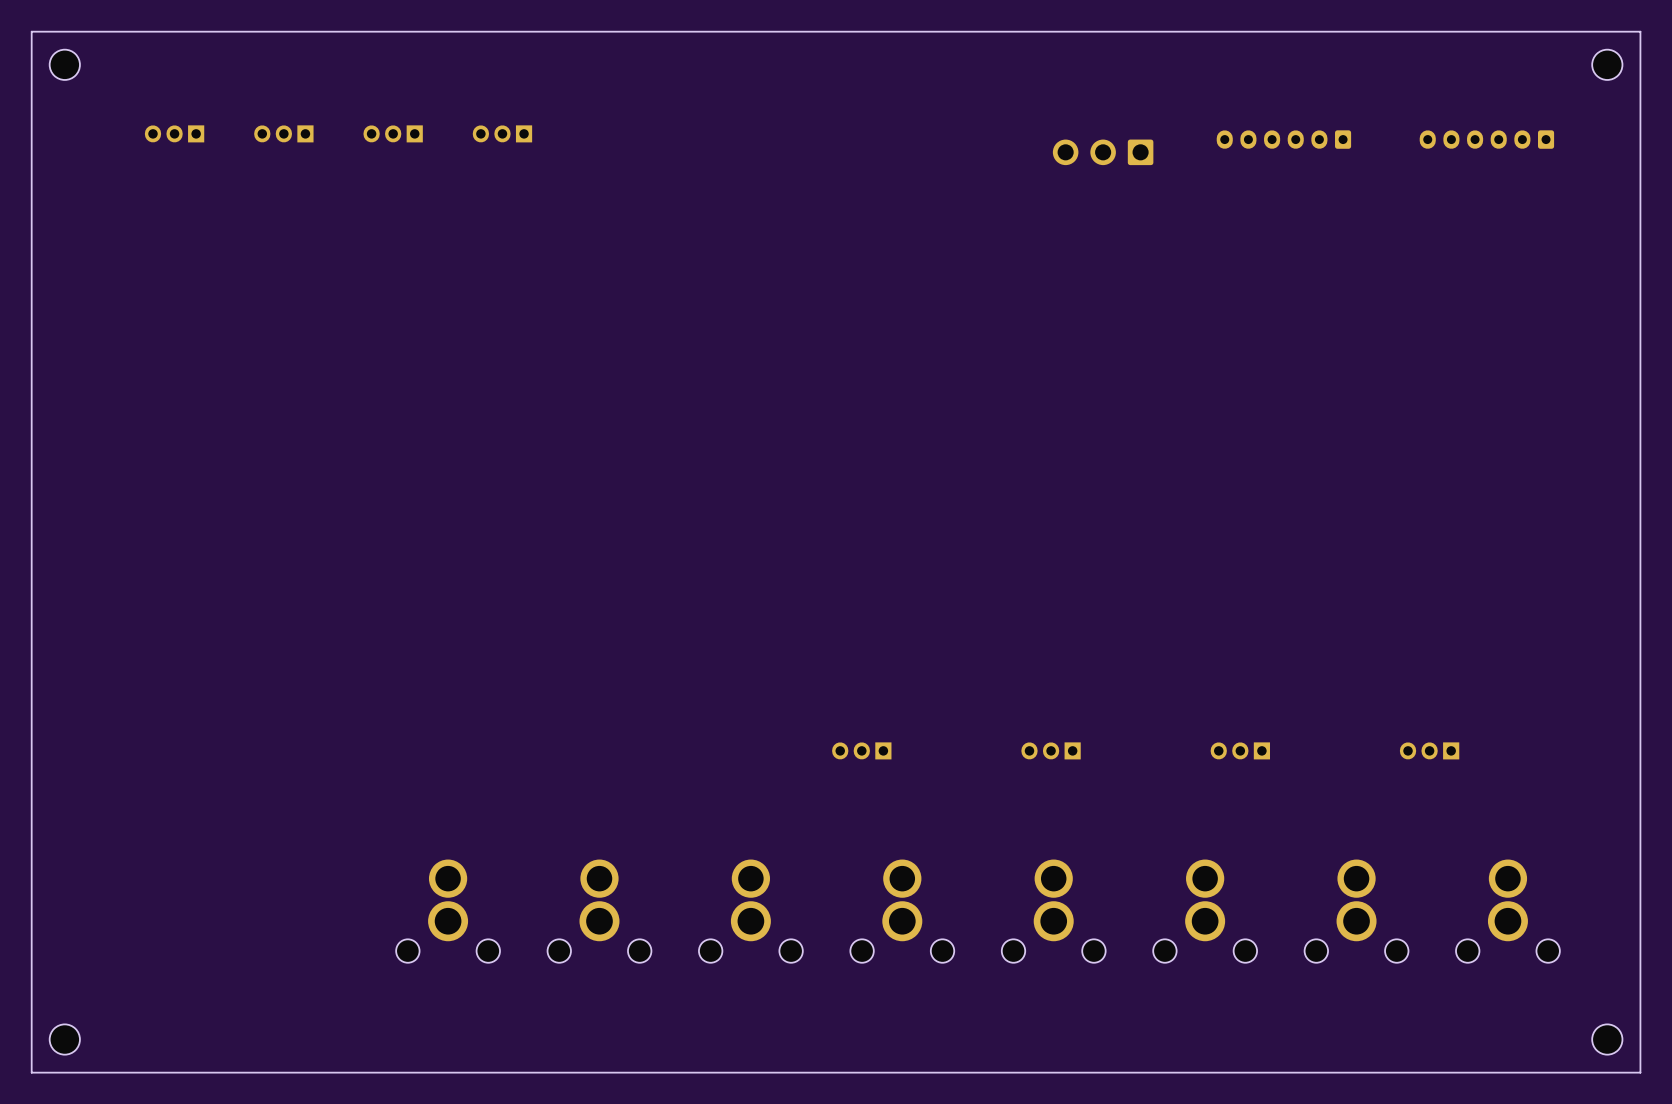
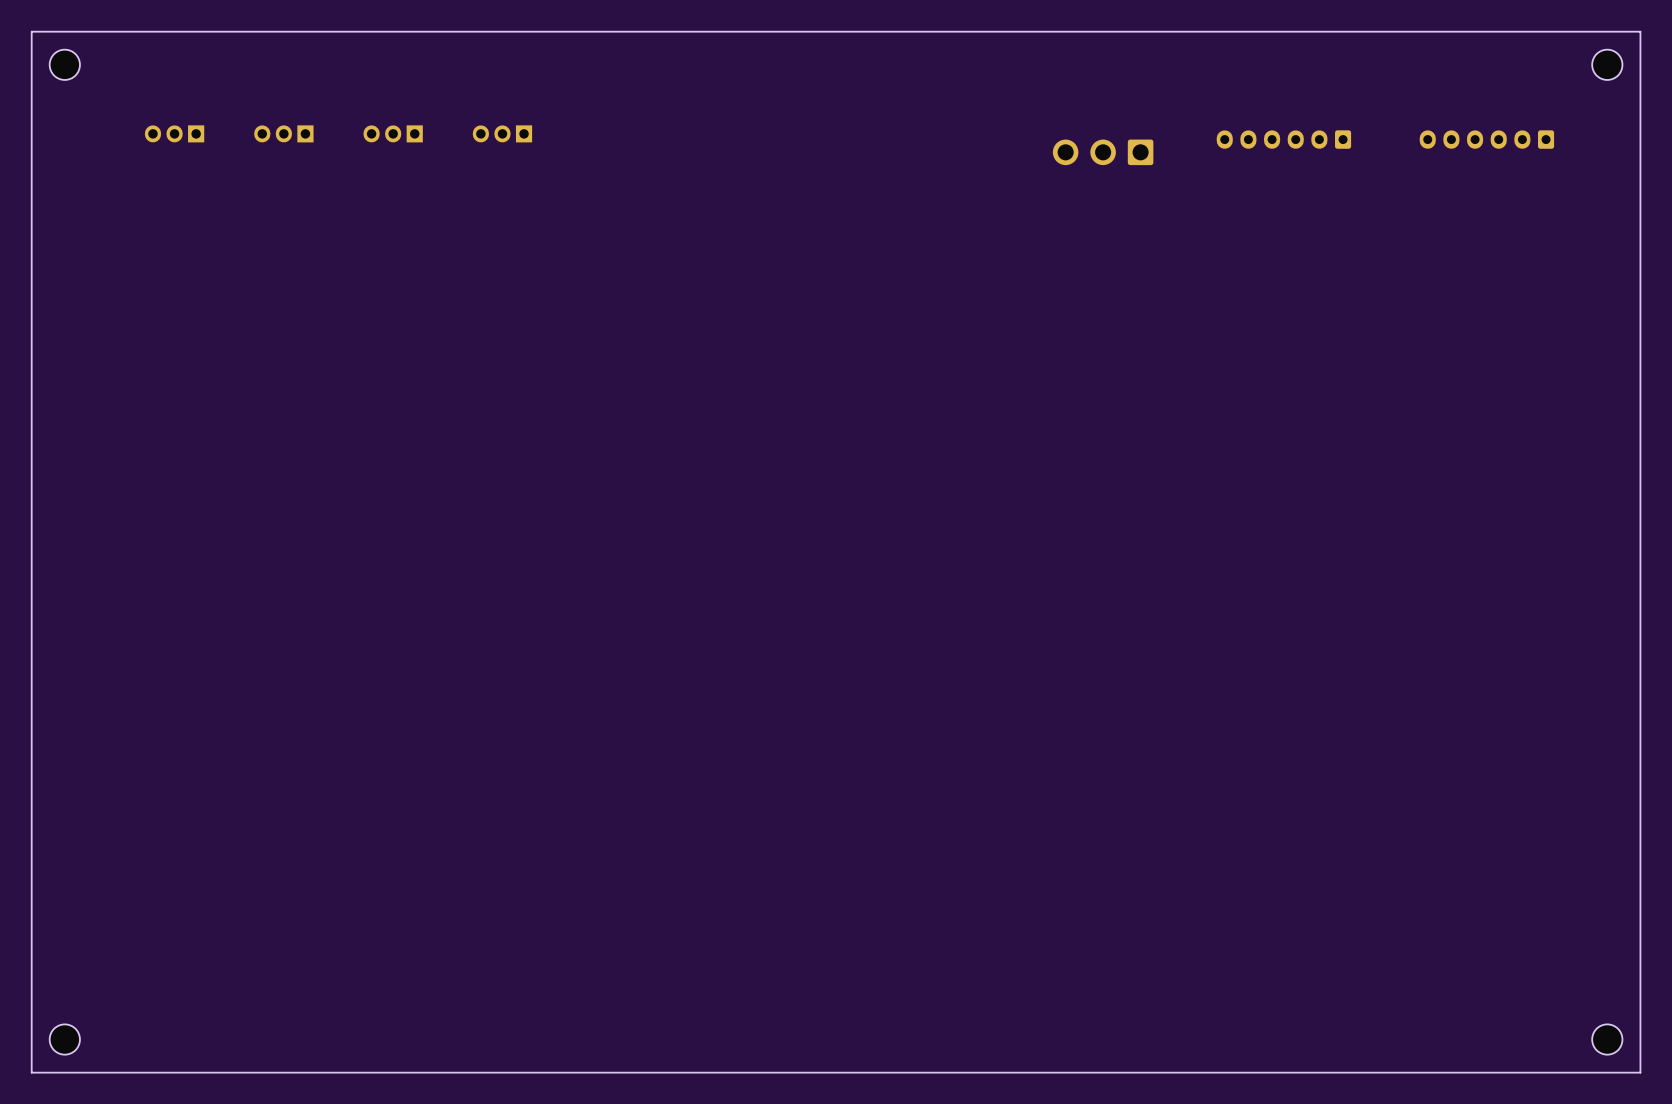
part: (861, 750) -> none
part: (1051, 750) -> none
part: (1240, 750) -> none
part: (1429, 750) -> none
part: (448, 911) -> none
part: (599, 911) -> none
part: (750, 911) -> none
part: (902, 911) -> none
part: (1053, 911) -> none
part: (1205, 911) -> none
part: (1356, 911) -> none
part: (1507, 911) -> none

